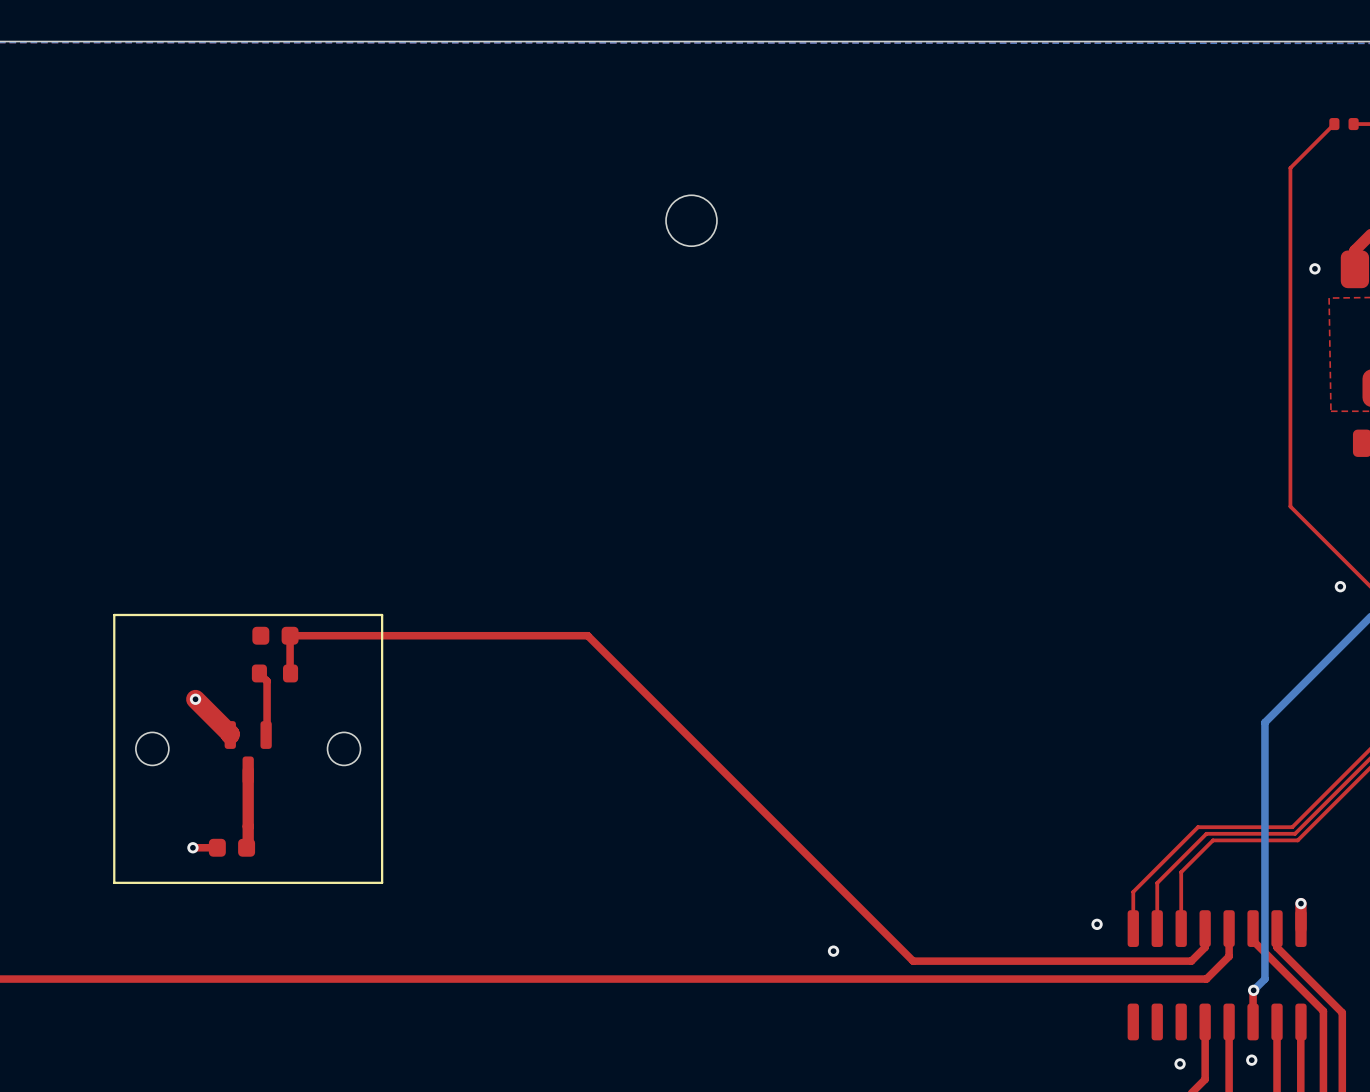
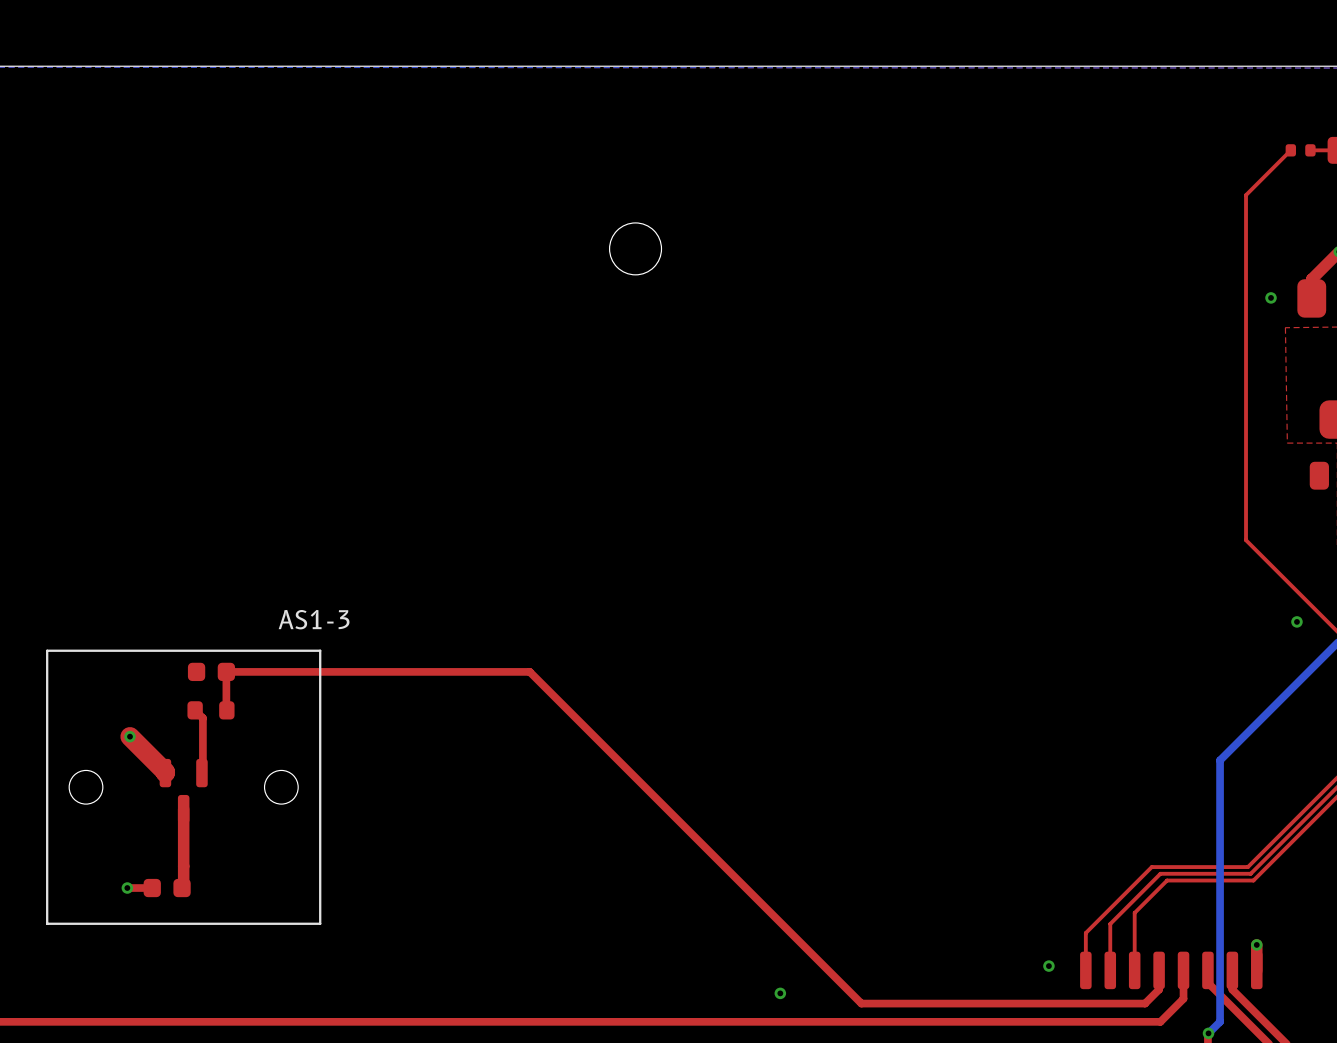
text: none -> AS1-3 (314, 619)

